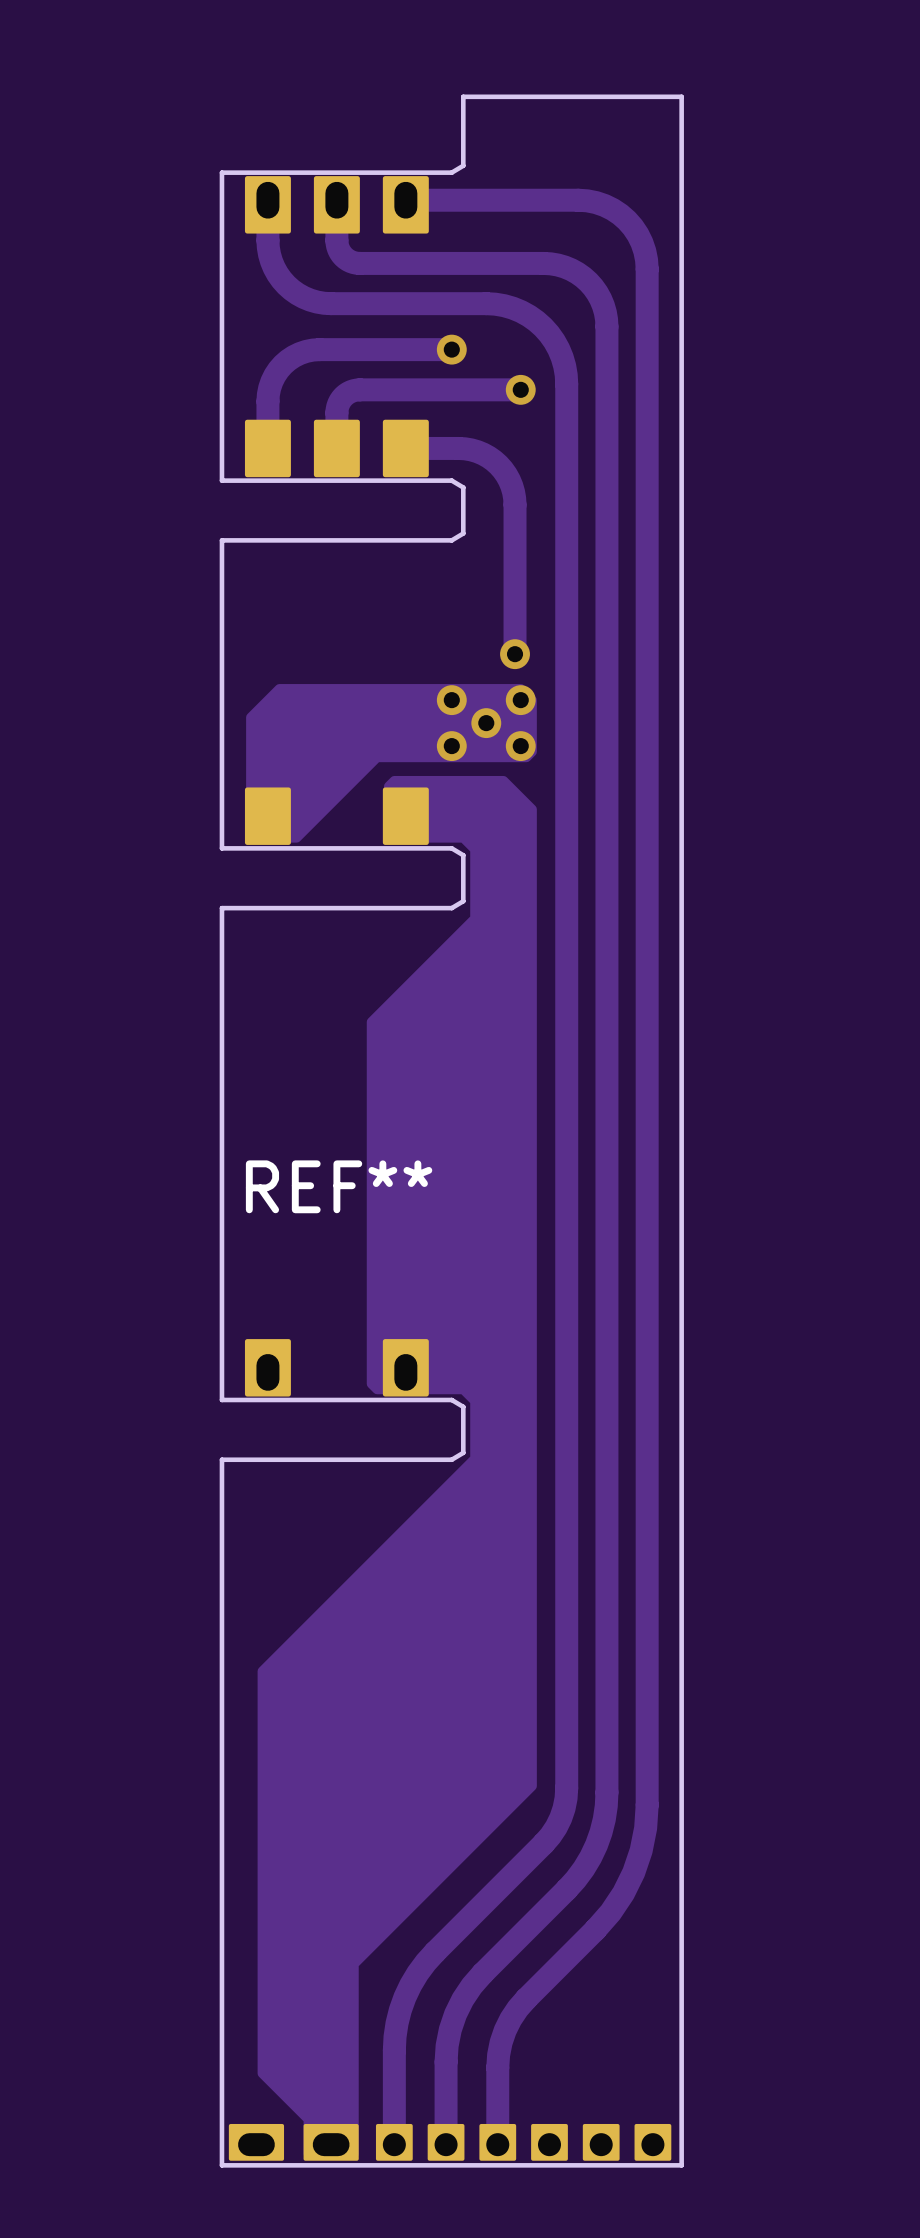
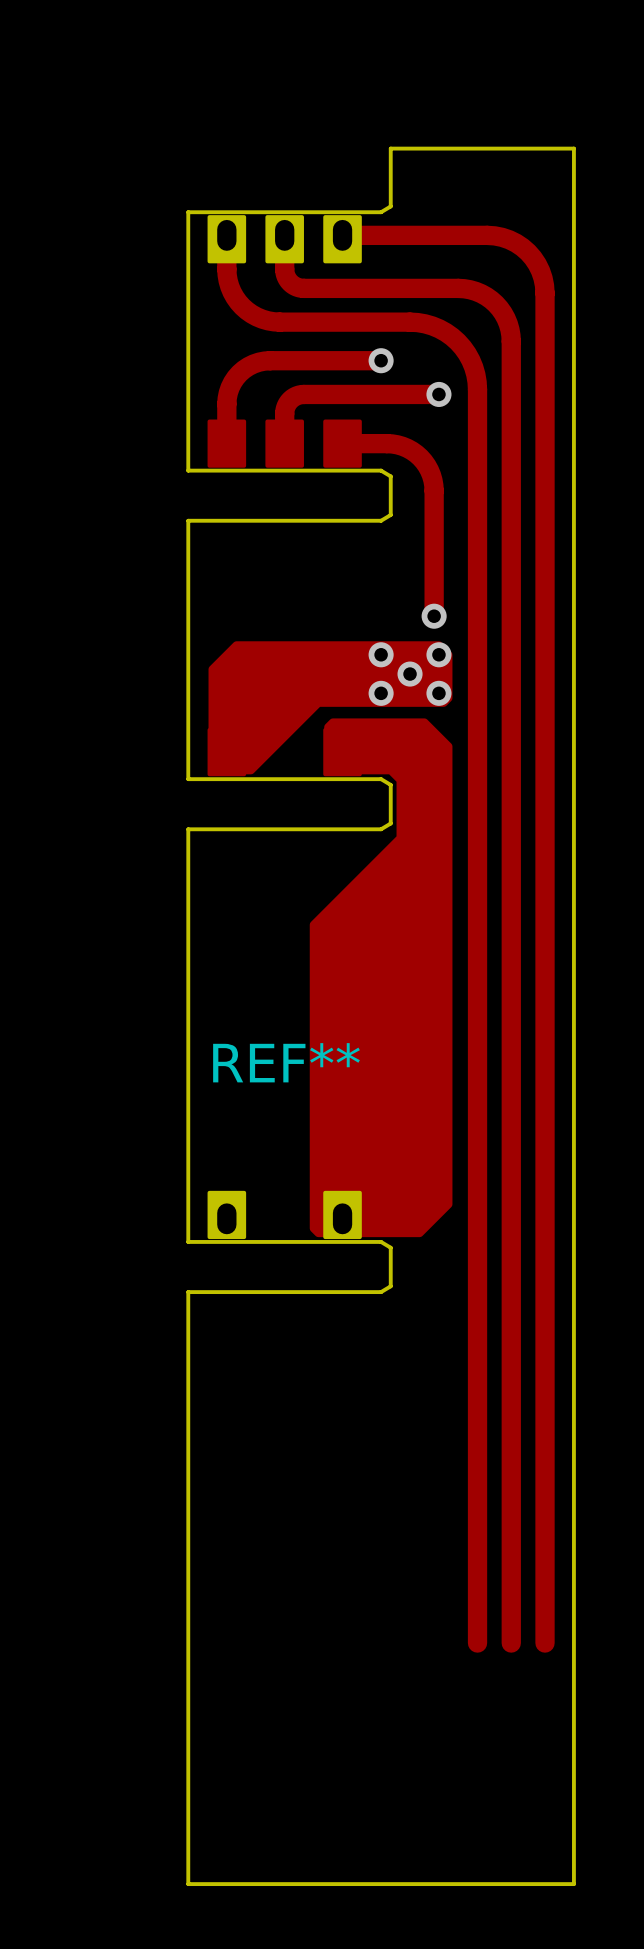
REF** footprint: [219, 94, 684, 2168] -> [186, 146, 576, 1887]
drawing: [257, 775, 537, 2159] -> none
drawing: none -> [309, 718, 453, 1238]
track: (566, 1788) (564, 1808) (550, 1835) (434, 1952) (410, 1985) (400, 2010) (395, 2036) (394, 2144) -> (477, 1567) (477, 1643)
track: (606, 1792) (601, 1832) (583, 1868) (566, 1889) (482, 1973) (471, 1985) (455, 2014) (447, 2045) (446, 2144) -> (511, 1571) (511, 1643)
track: (647, 1804) (645, 1827) (641, 1850) (633, 1872) (623, 1893) (610, 1912) (595, 1929) (517, 2008) (505, 2030) (498, 2054) (497, 2067) (497, 2144) -> (545, 1581) (545, 1643)

